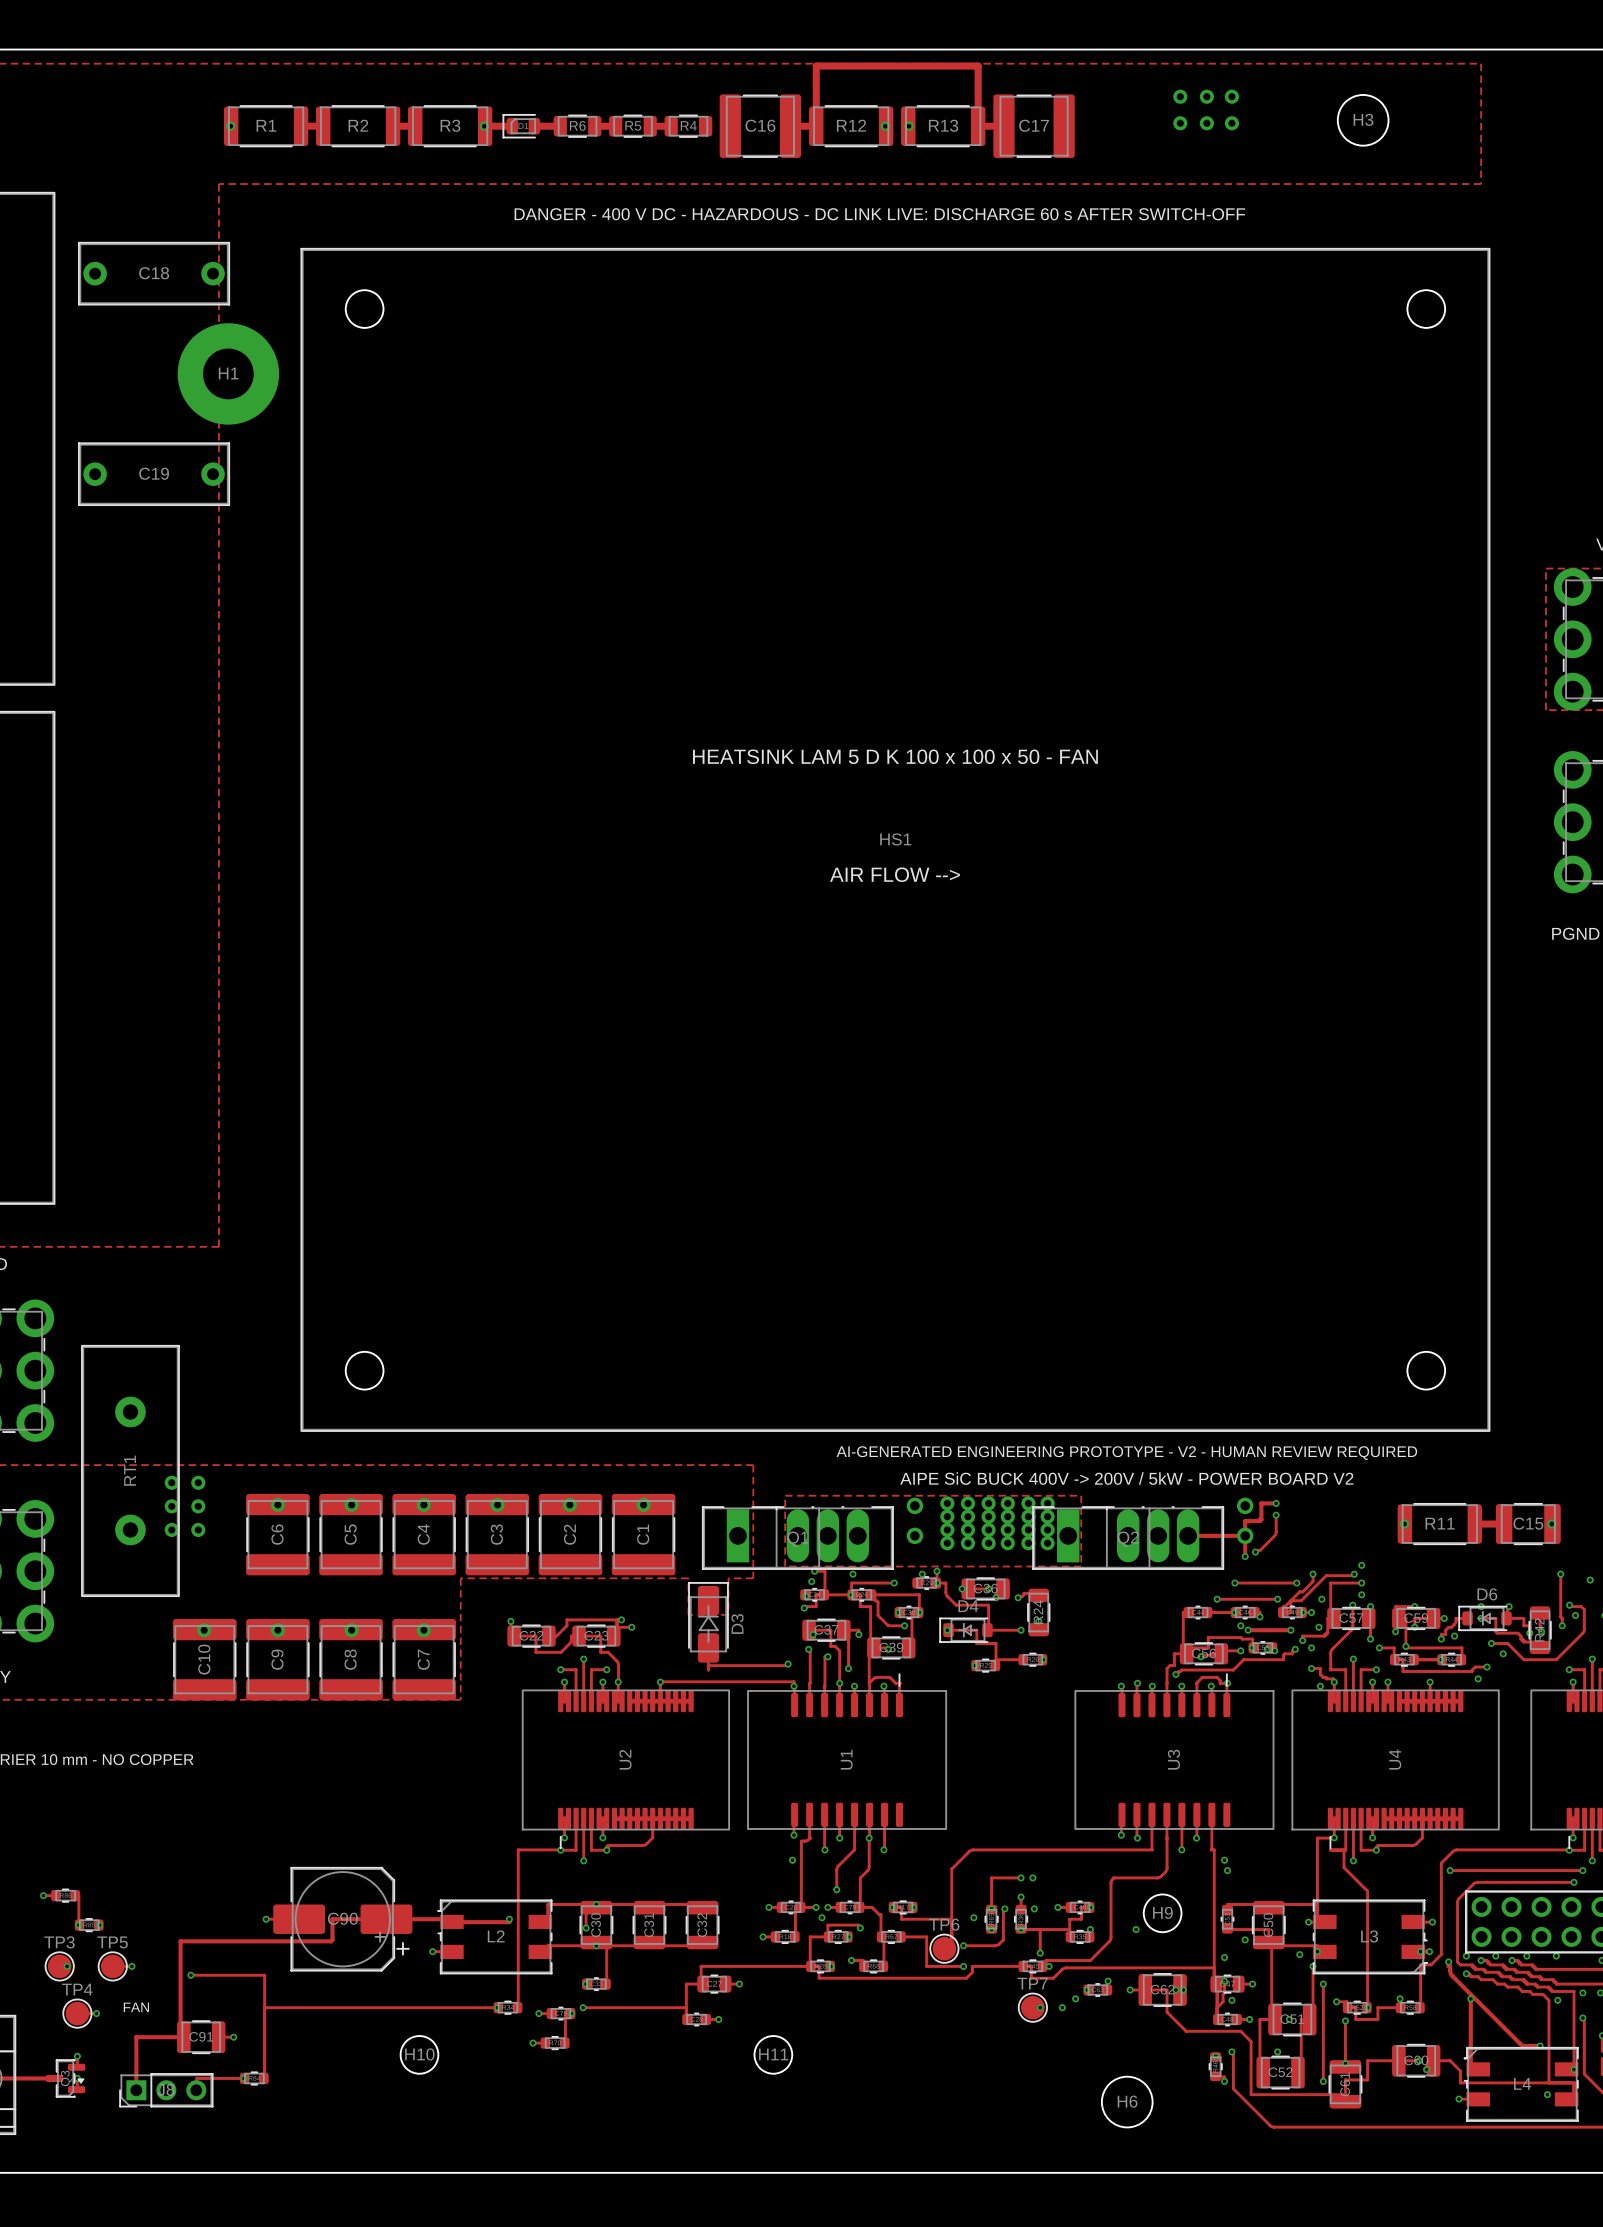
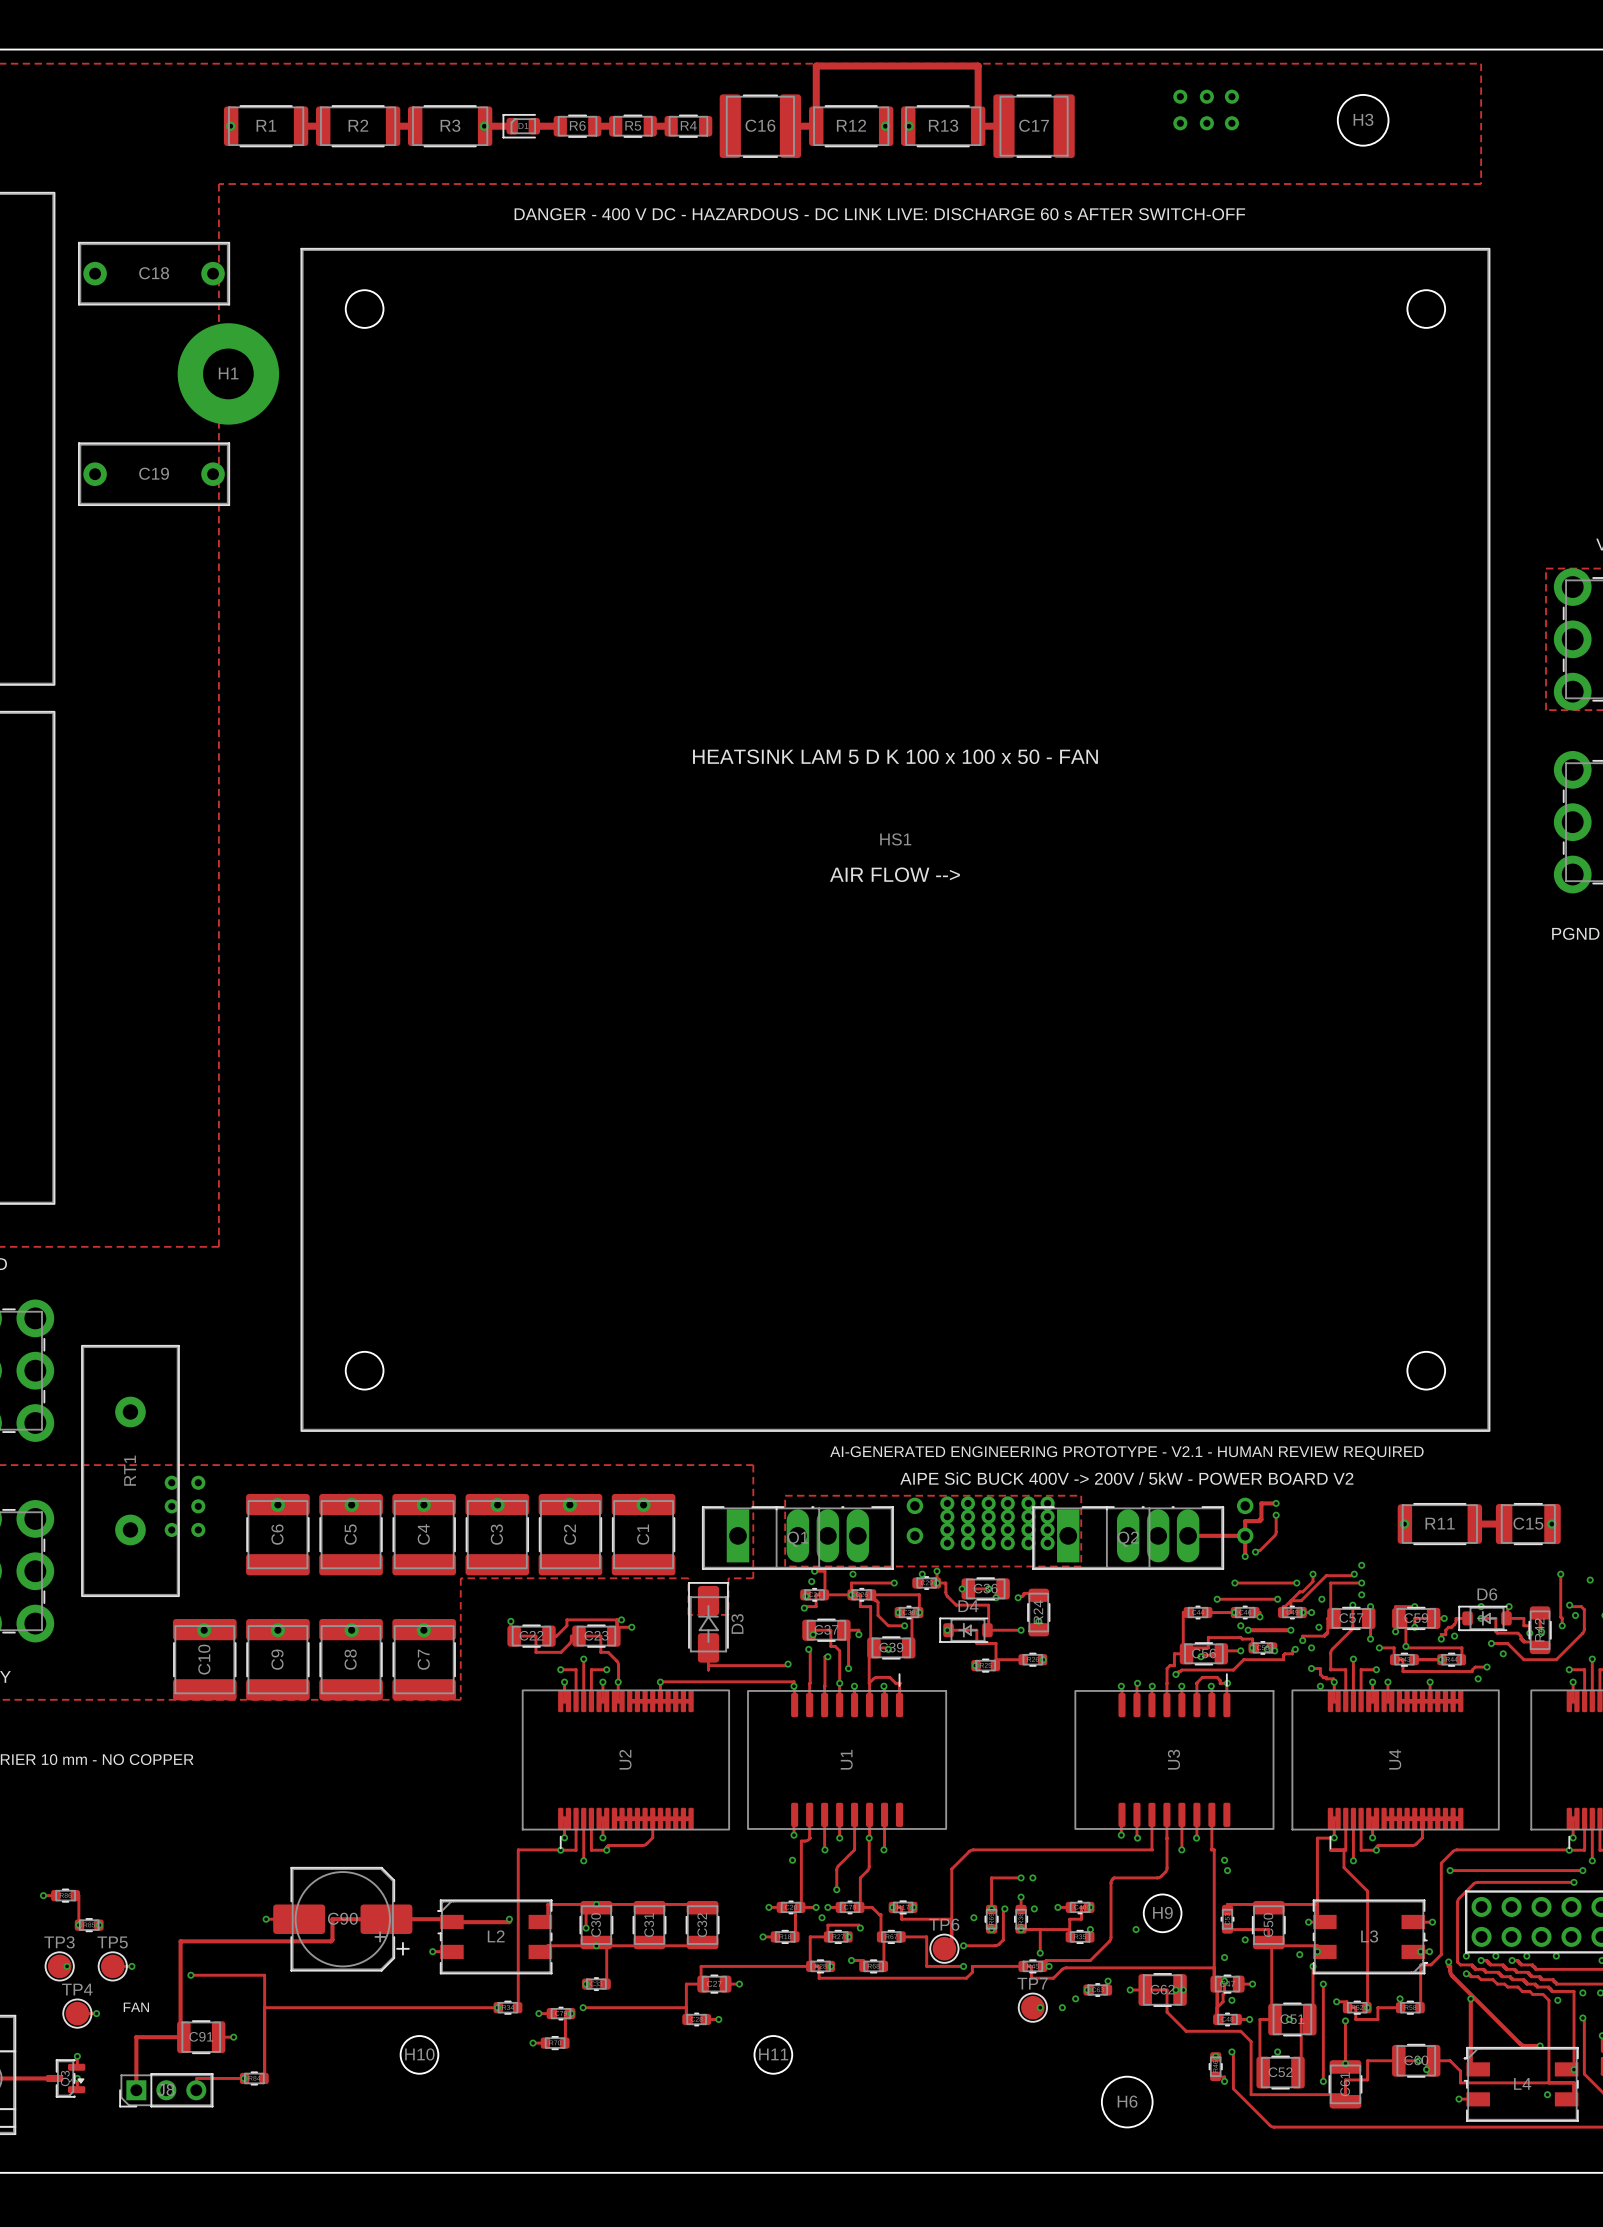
text: AI-GENERATED ENGINEERING PROTOTYPE - V2 - HUMAN REVIEW REQUIRED (1126, 1453) -> AI-GENERATED ENGINEERING PROTOTYPE - V2.1 - HUMAN REVIEW REQUIRED (1126, 1453)

